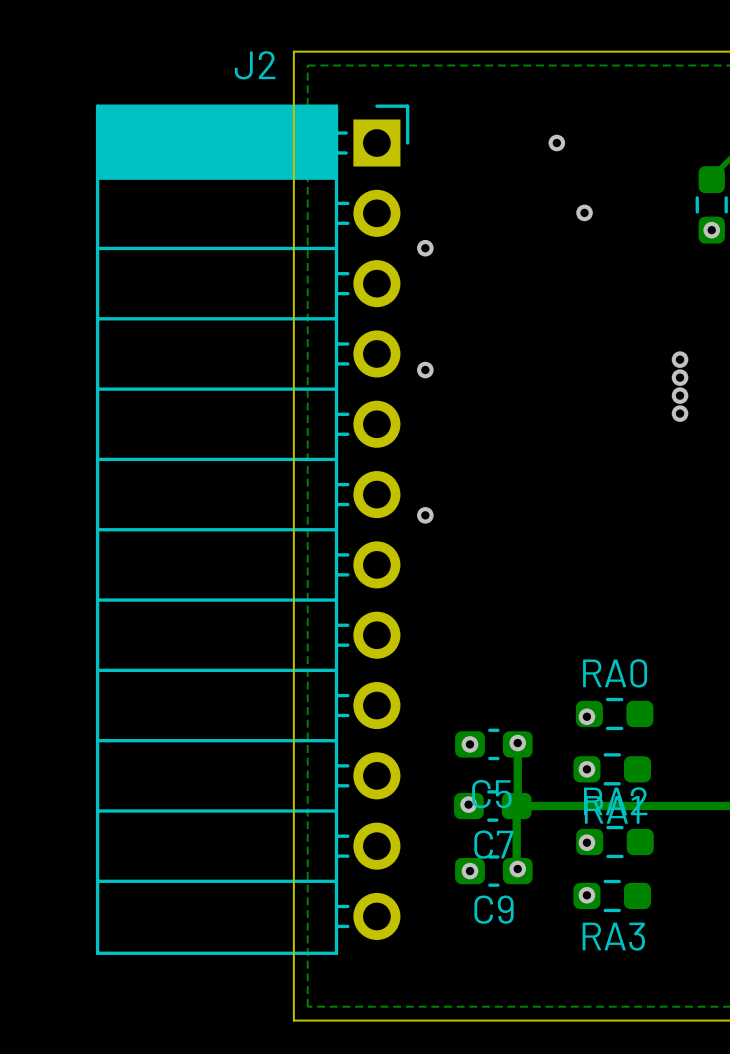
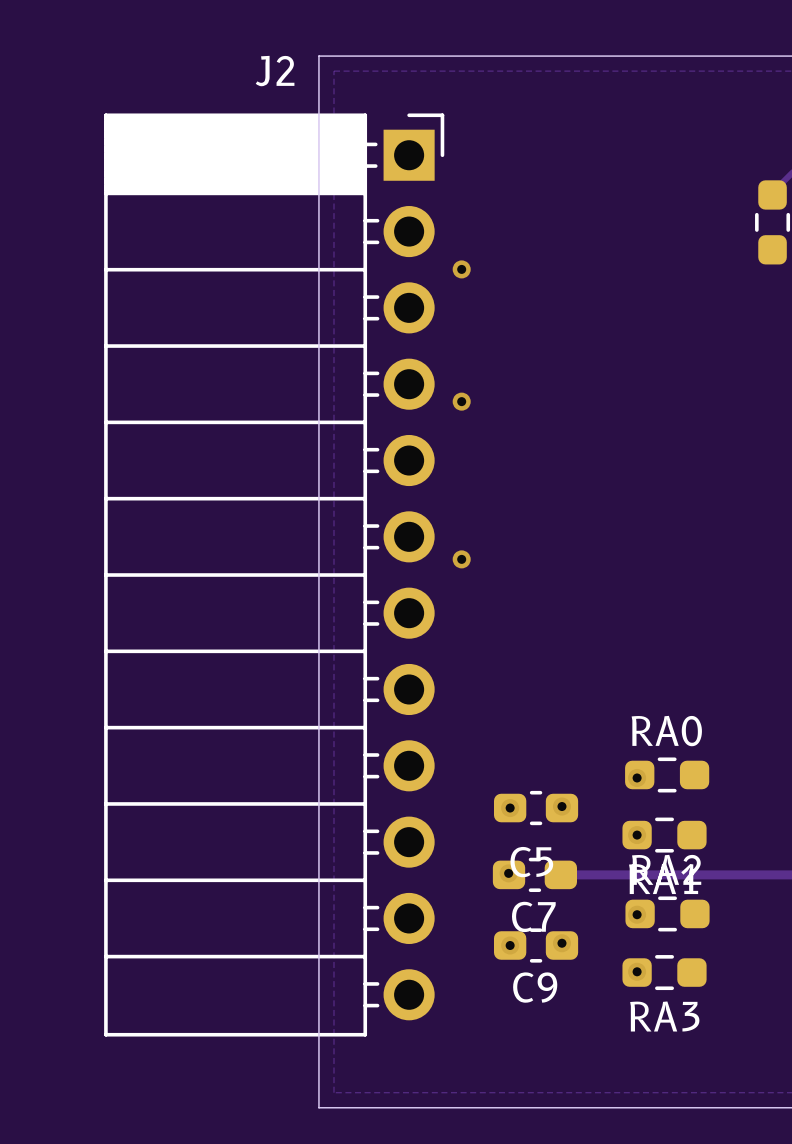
via: (556, 143) -> none
via: (584, 212) -> none
via: (711, 230) -> none
via: (680, 359) -> none
via: (680, 377) -> none
via: (680, 395) -> none
via: (680, 413) -> none
track: (517, 743) (517, 869) -> none

